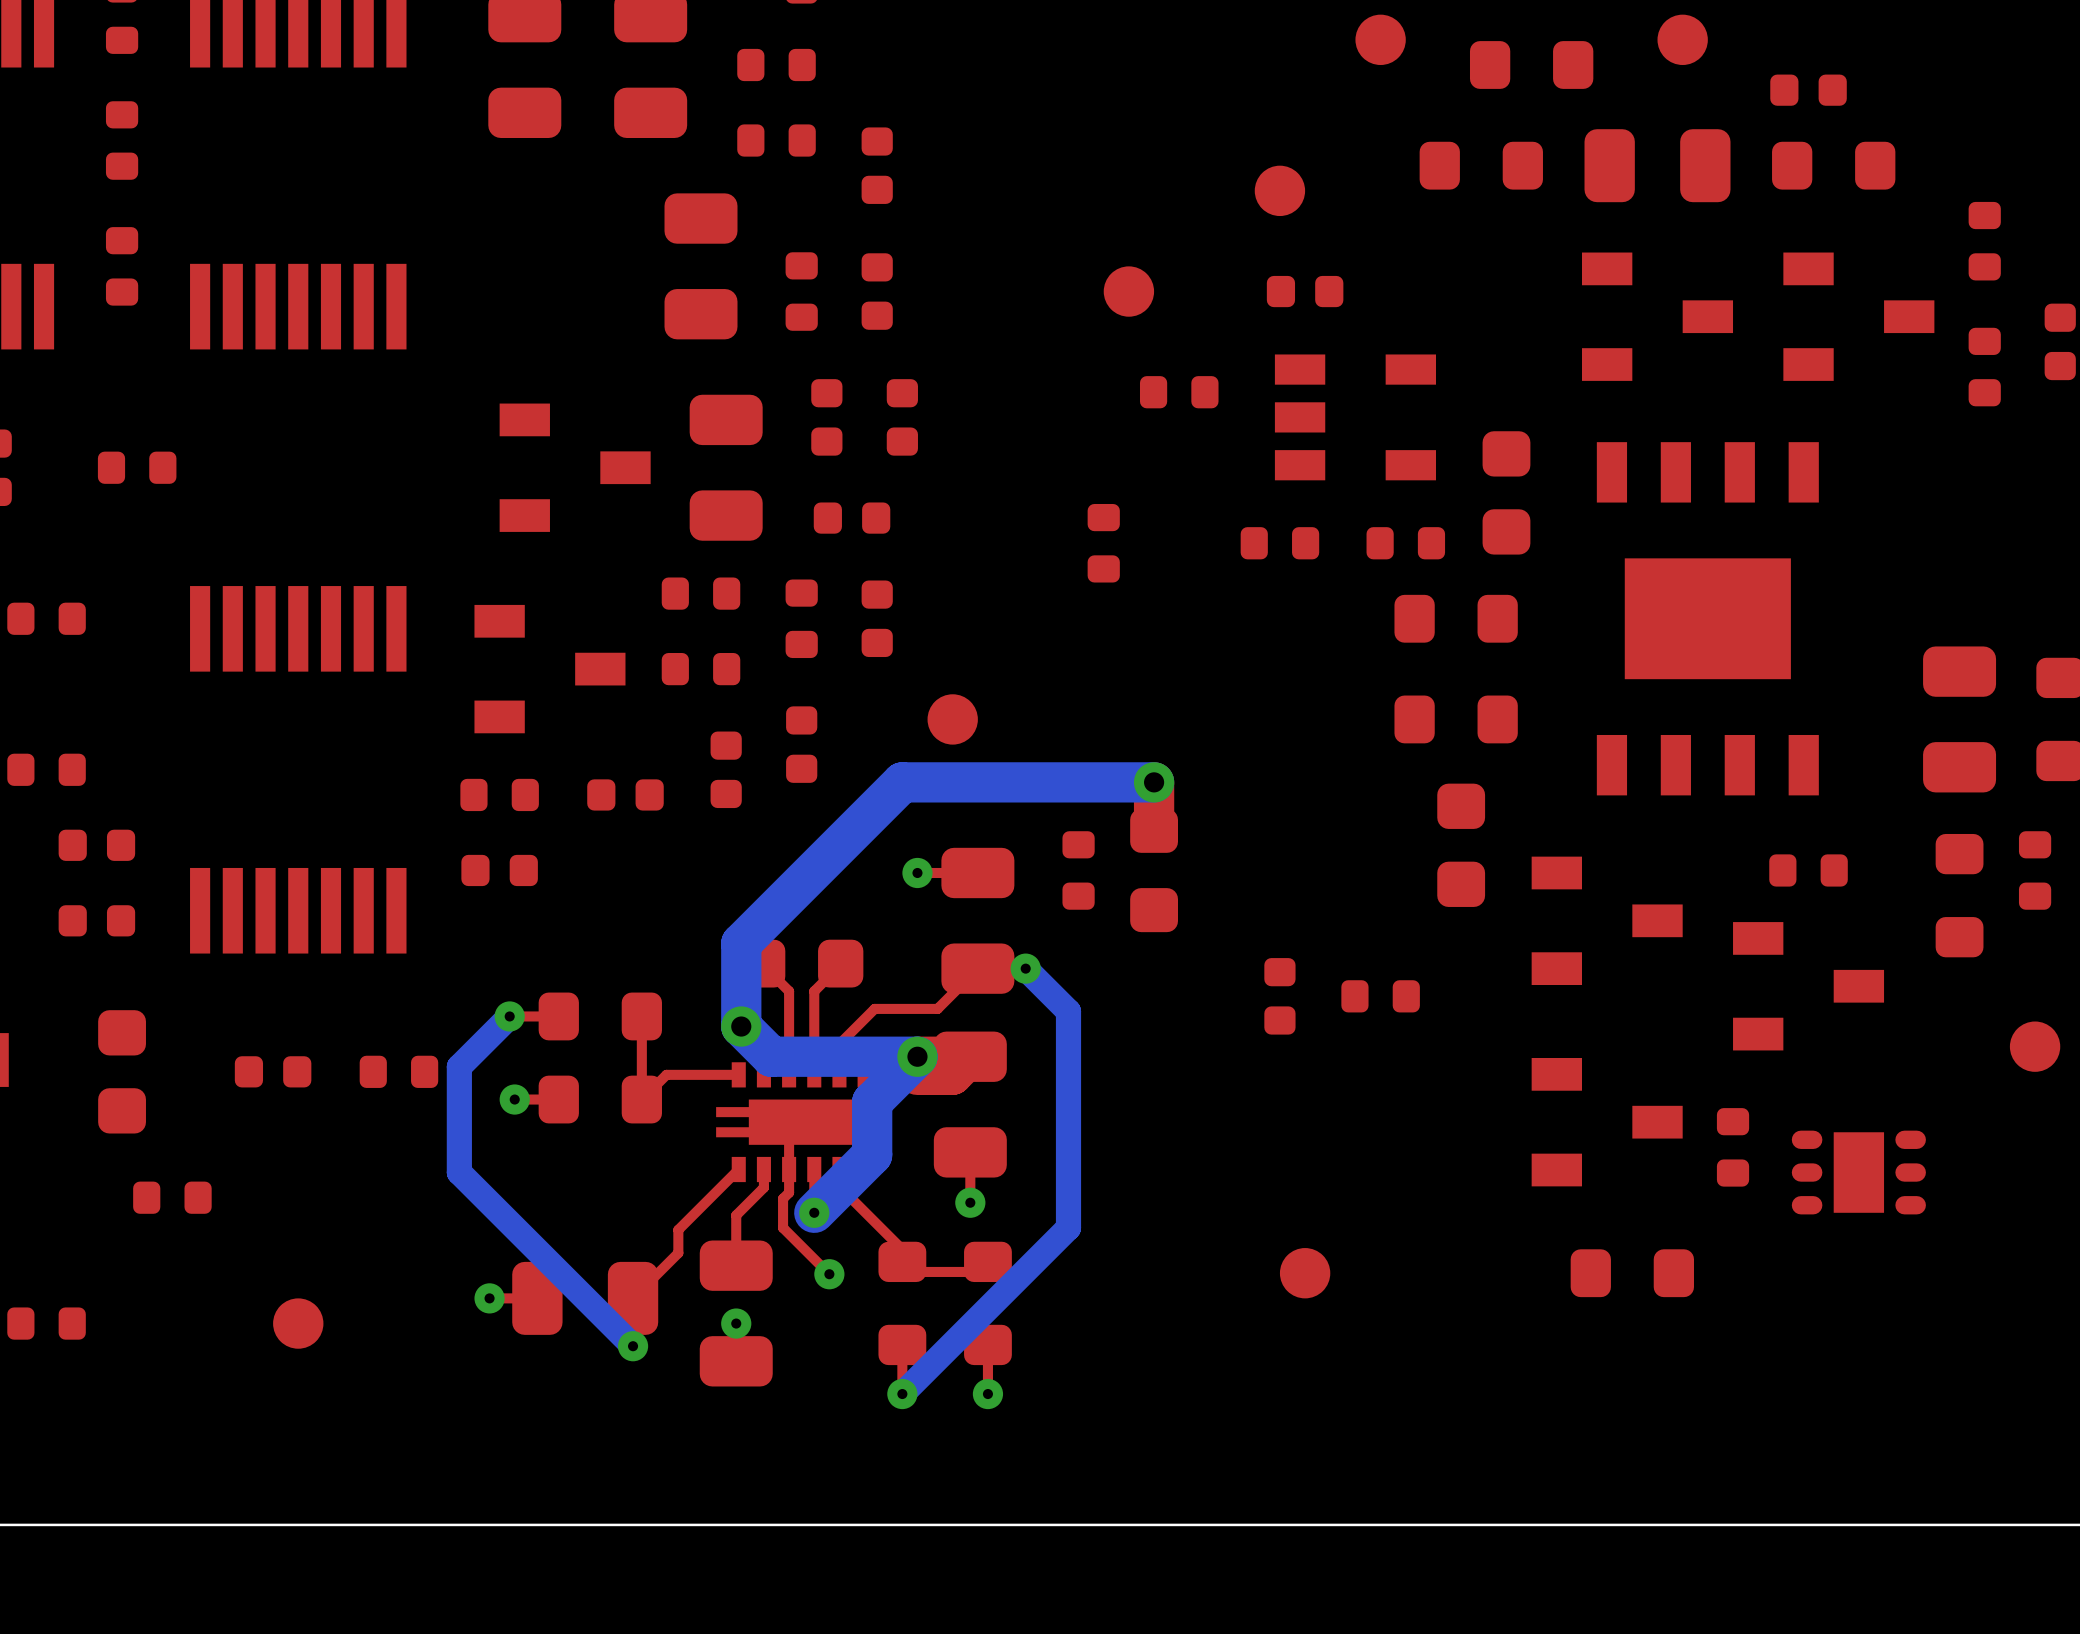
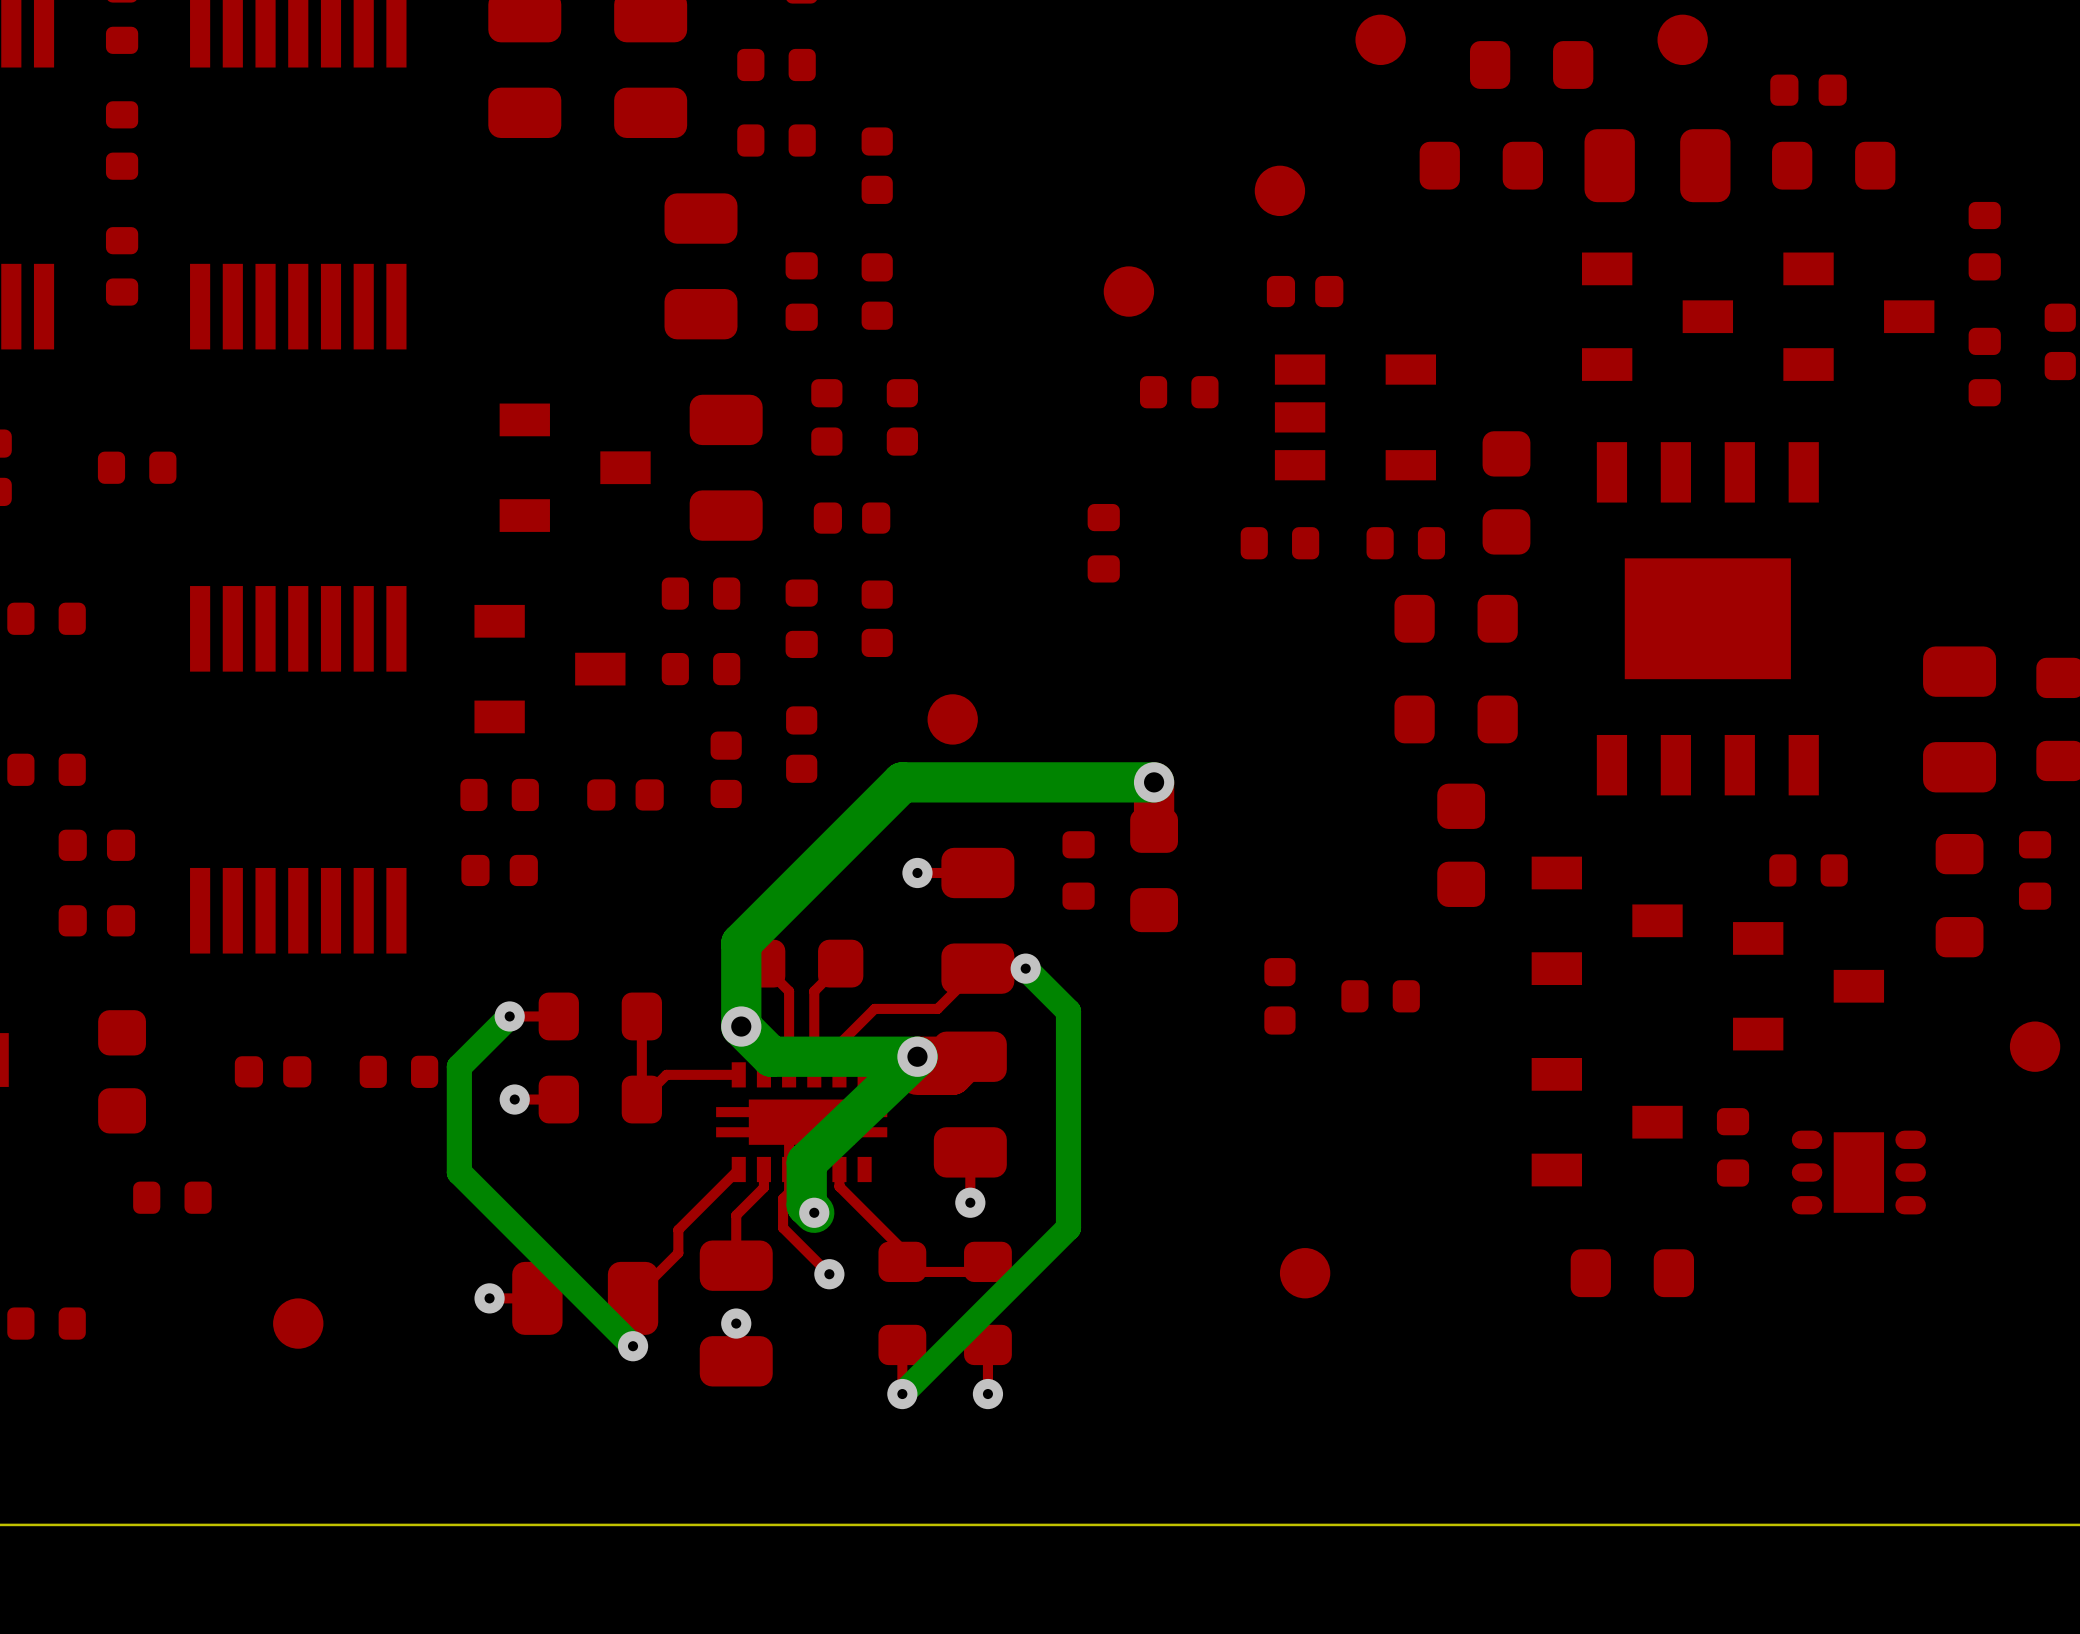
bottom track: (917, 1056) (872, 1102) (872, 1154) (814, 1212) -> (917, 1056) (806, 1162) (806, 1205) (814, 1212)

